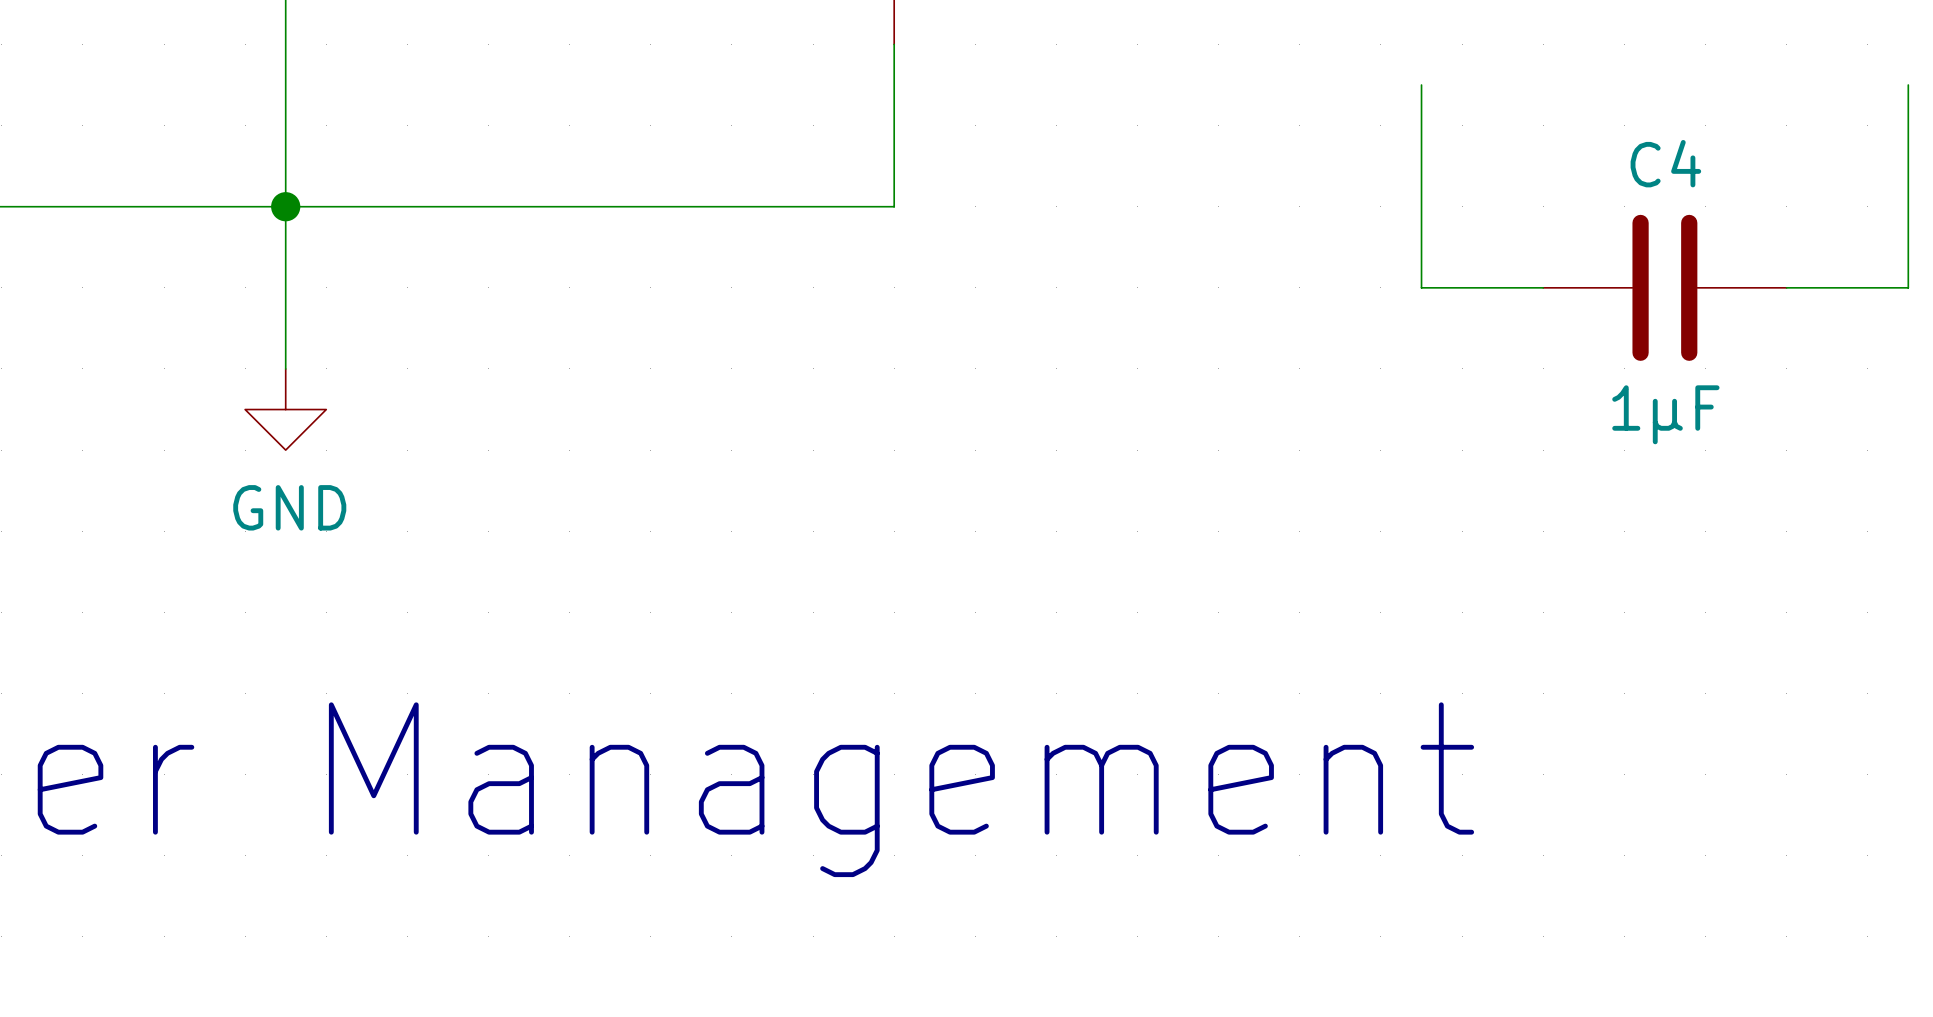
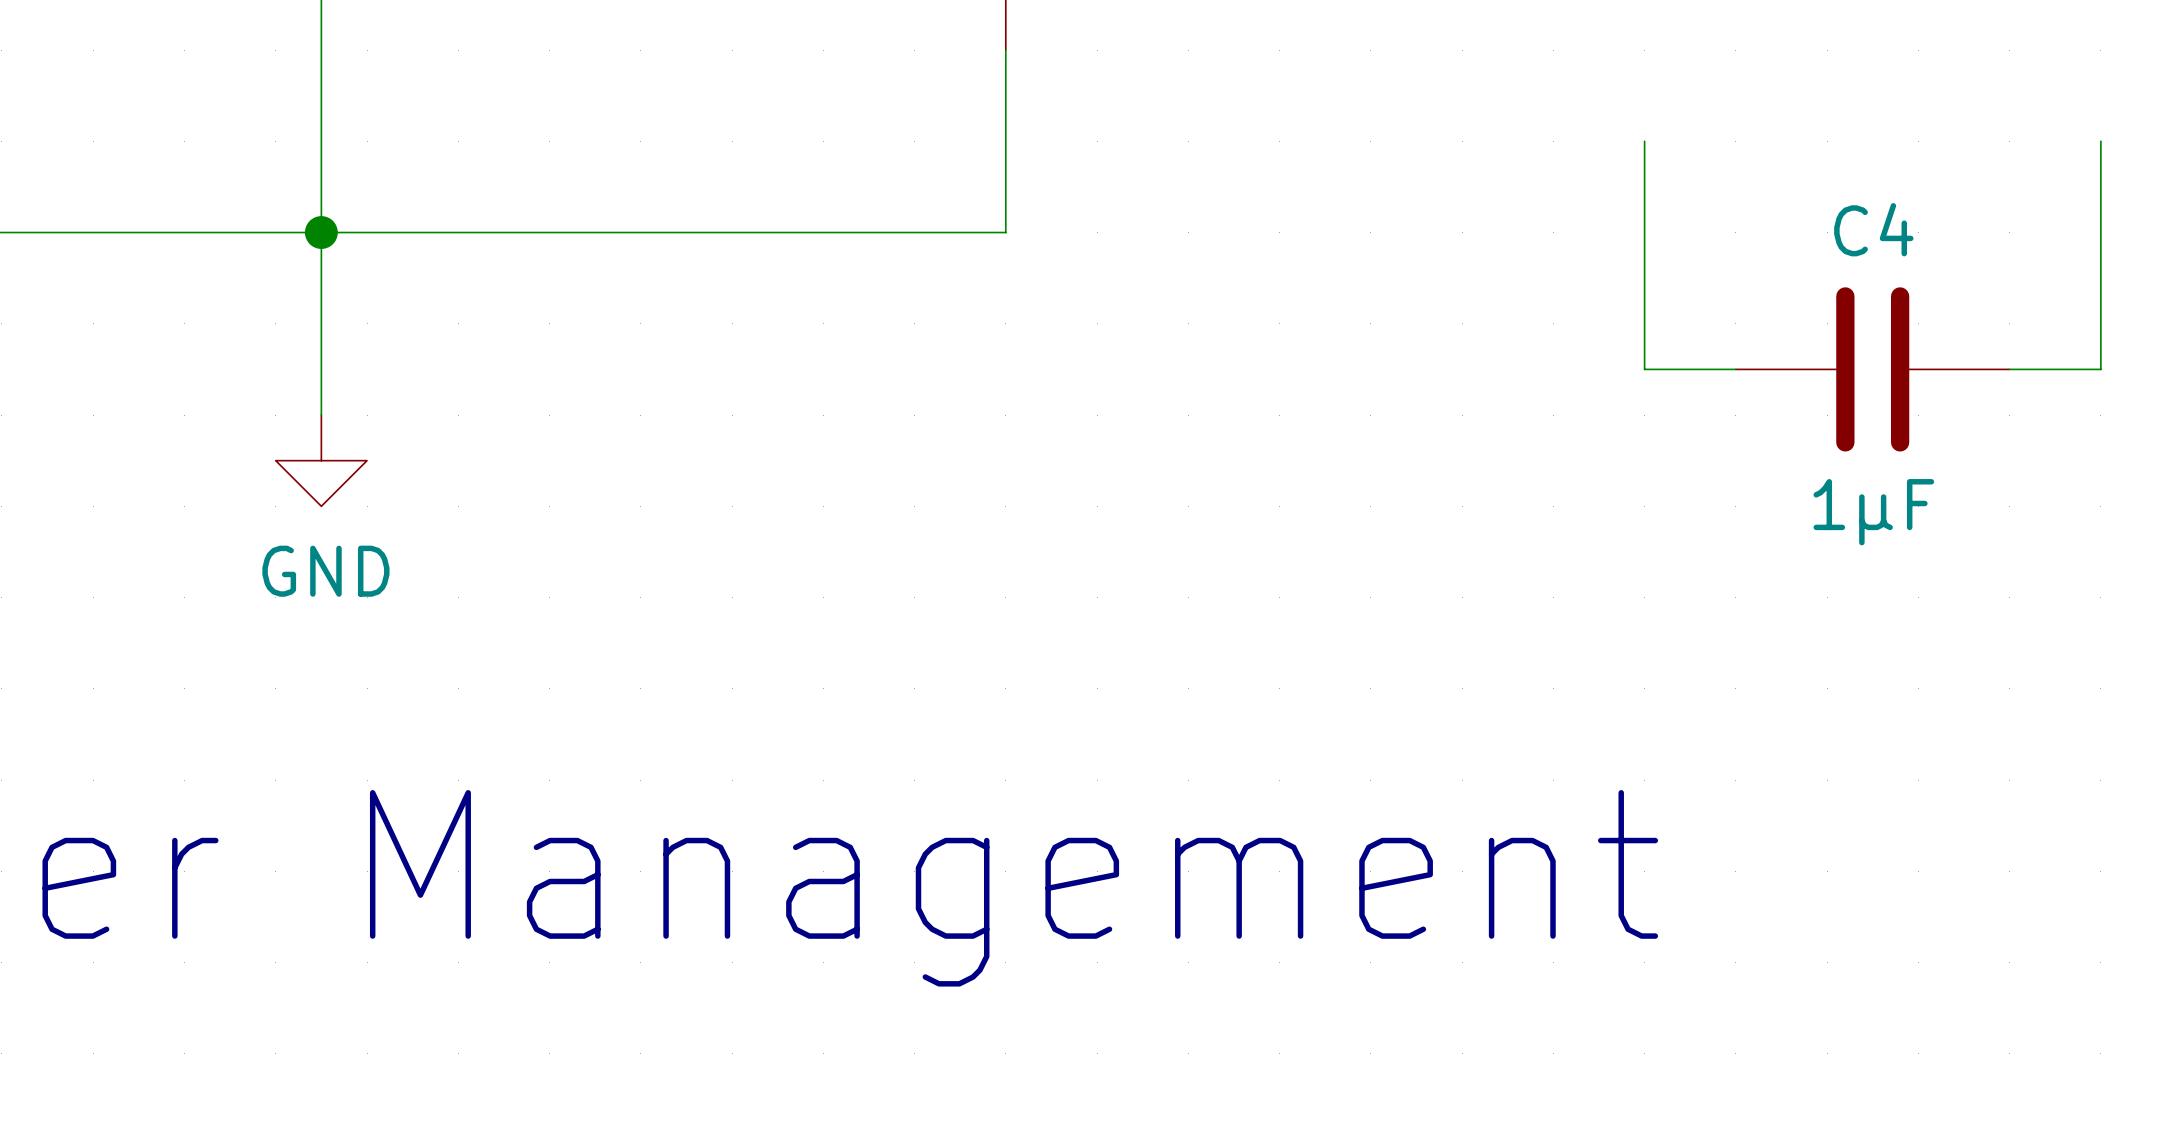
wire: (1421, 85) (1421, 287) (1543, 287) -> none
wire: (1908, 85) (1908, 287) (1786, 287) -> none
wire: none -> (1644, 141) (1644, 369) (1735, 369)
wire: none -> (2100, 141) (2100, 369) (2009, 369)
C4 position: (1664, 287) -> (1872, 369)

